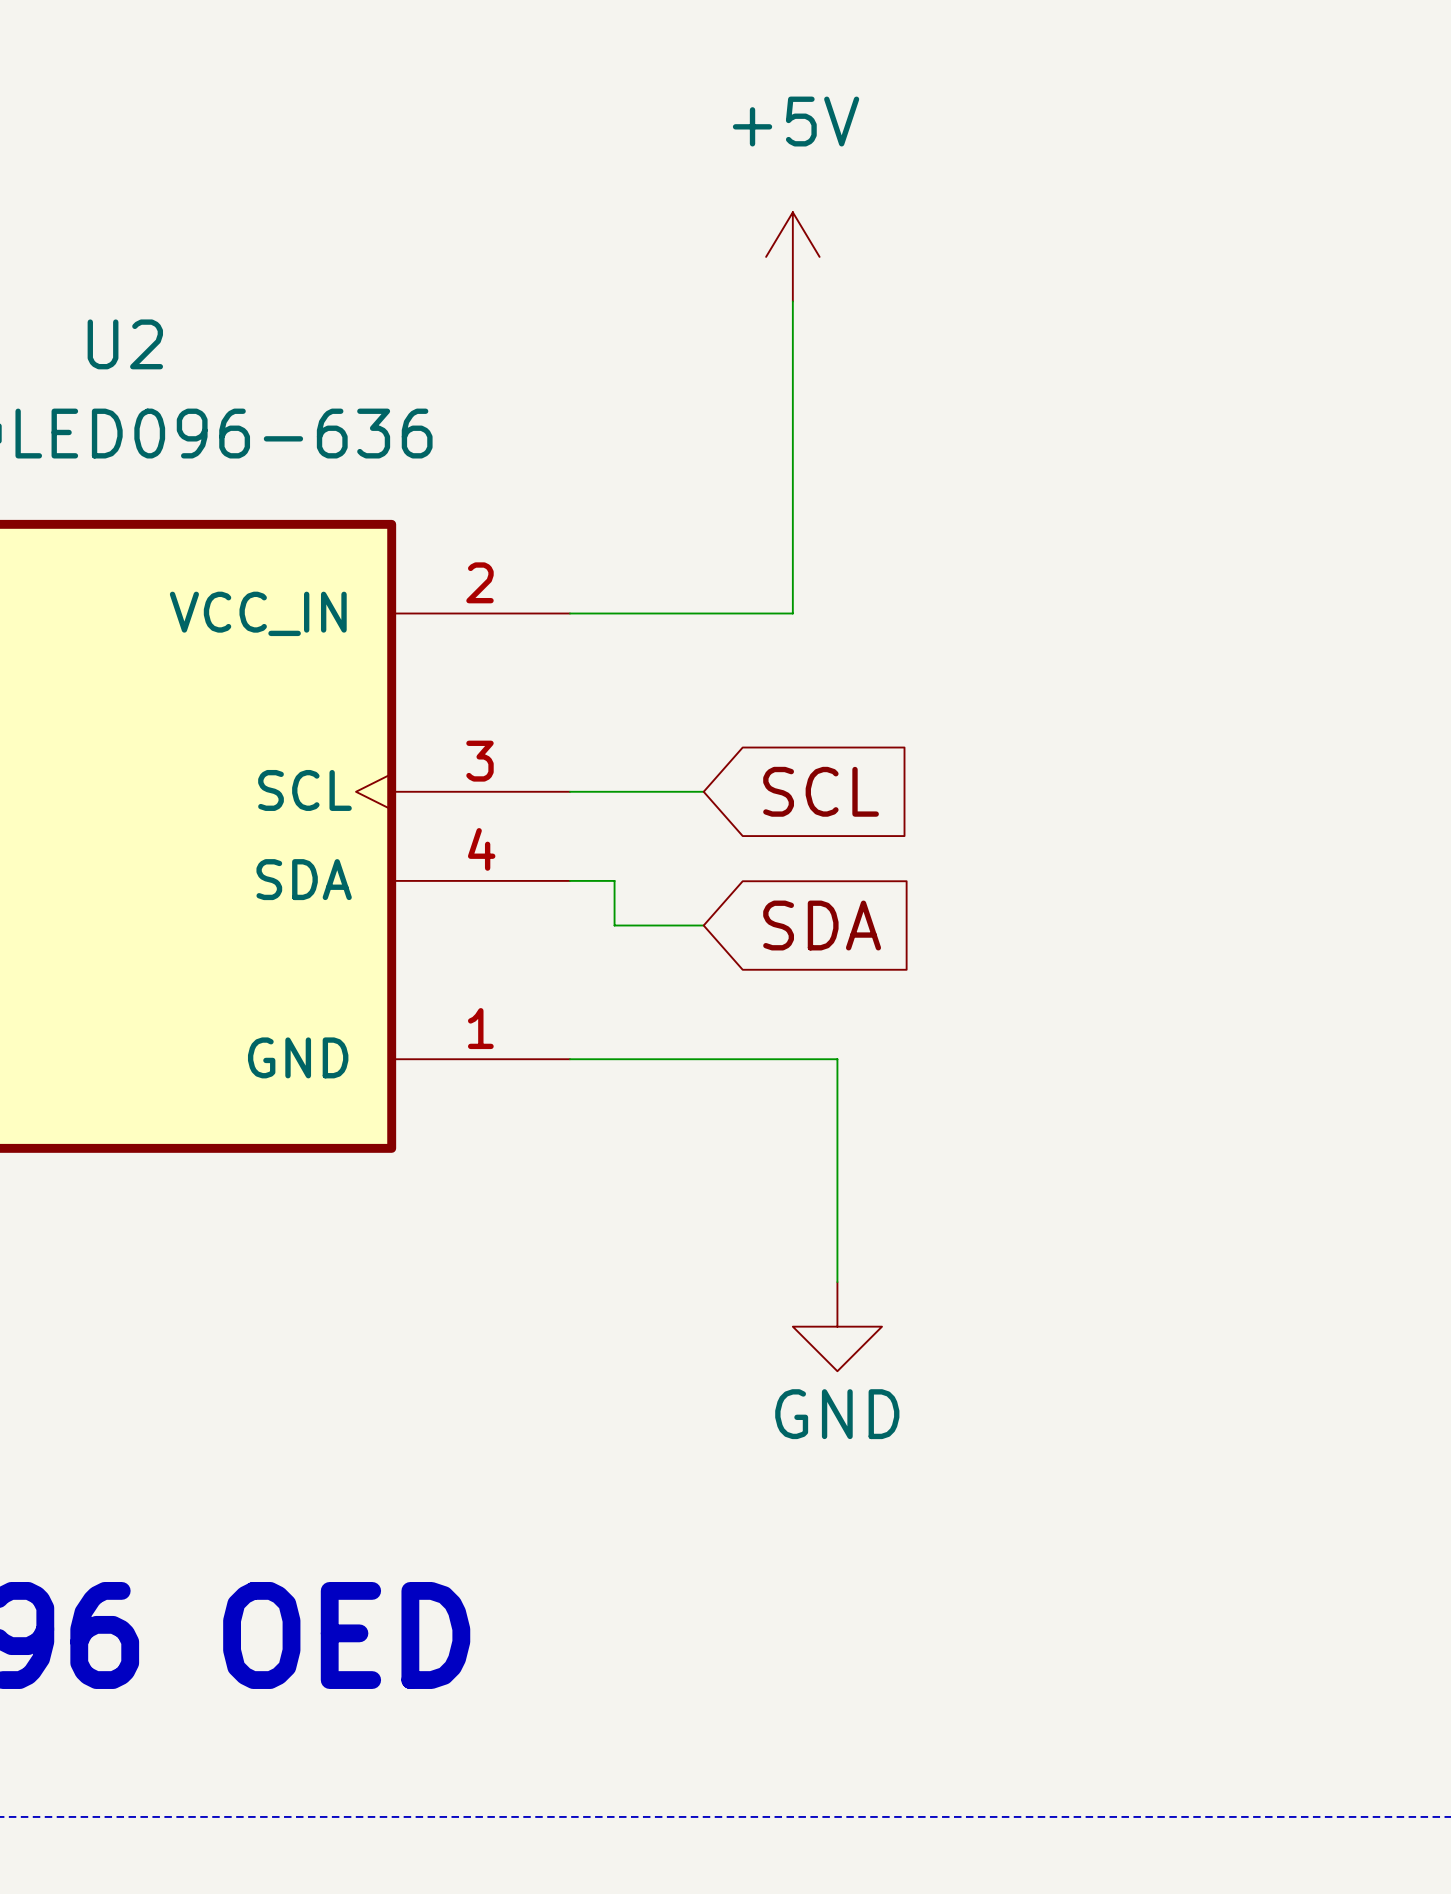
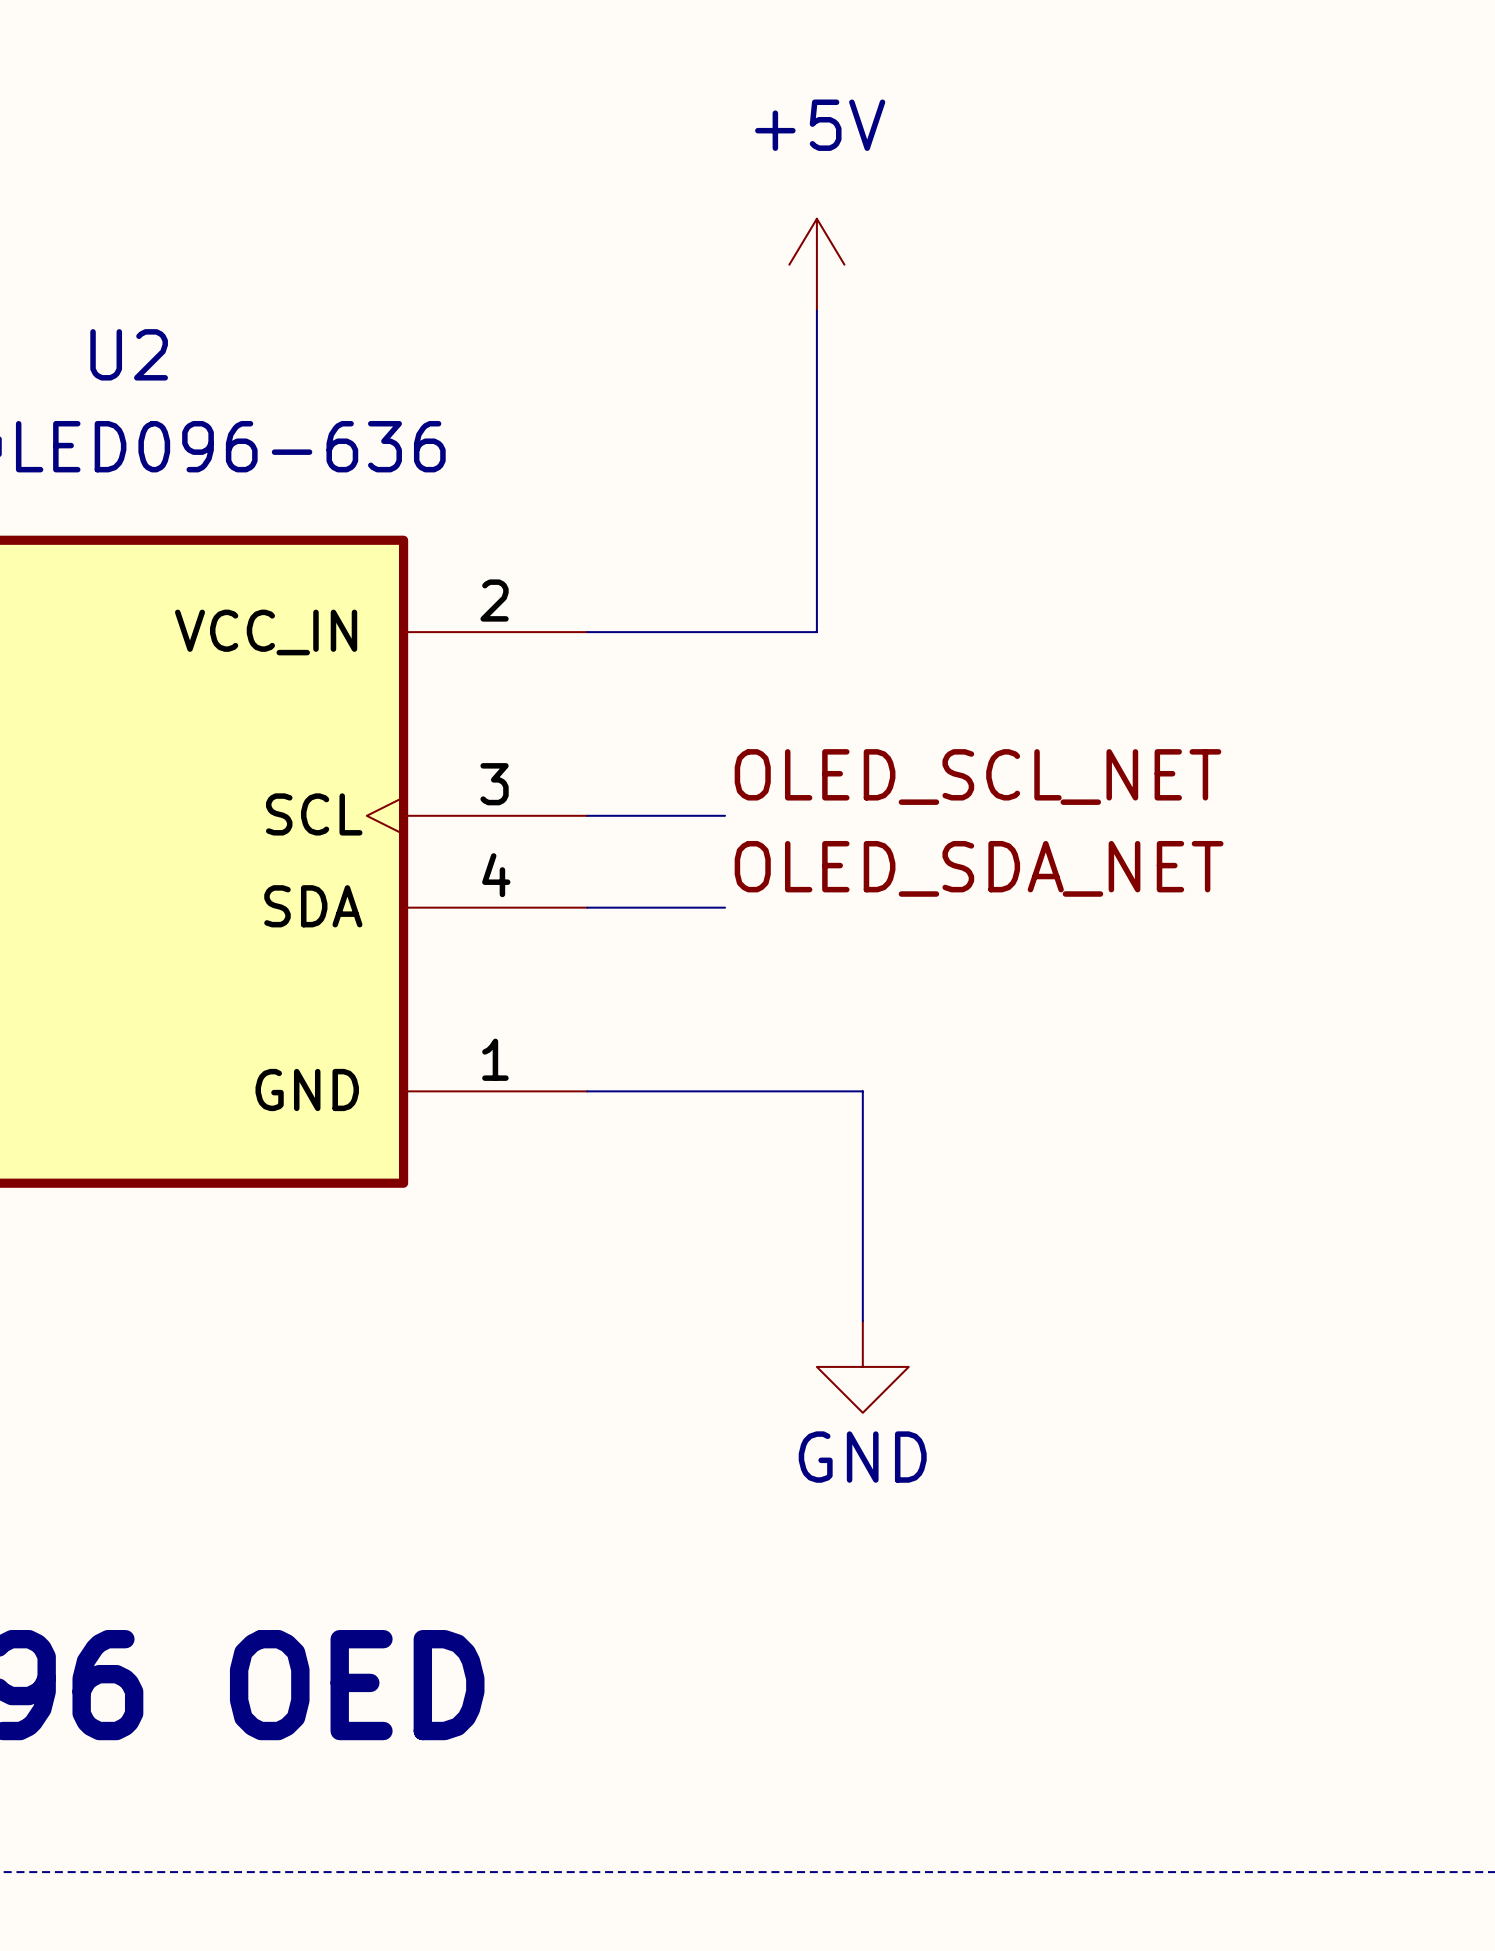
label: none -> OLED_SCL_NET (977, 777)
global label: SCL (821, 791) -> none
label: none -> OLED_SDA_NET (979, 868)
wire: (614, 880) (614, 925) (703, 925) -> (633, 907) (725, 907)
global label: SDA (822, 925) -> none

